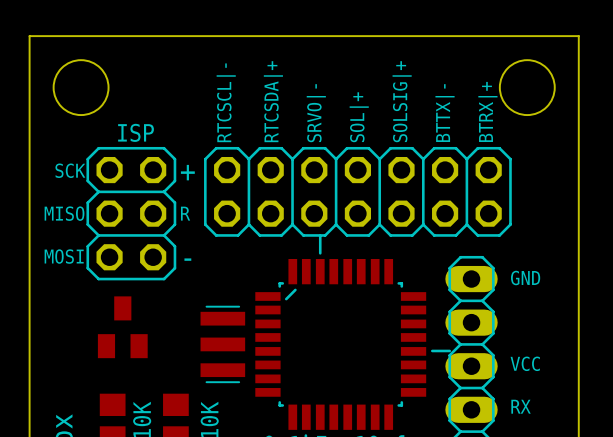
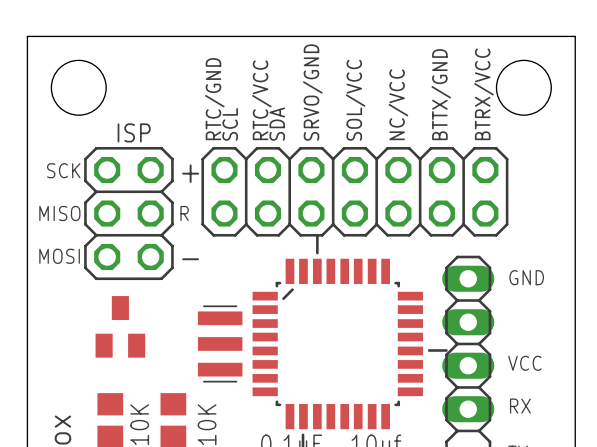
text: RTCSDA|+ (273, 101) -> none
text: SOLSIG|+ (402, 101) -> NC/VCC (398, 104)
text: RTCSCL|- (226, 102) -> none
text: none -> RTC/GND (214, 99)
text: none -> RTC/VCC (261, 100)
text: BTRX|+ (487, 111) -> BTRX/VCC (484, 94)
text: SRVO|- (316, 113) -> SRVO/GND (312, 92)
text: BTTX|- (445, 113) -> BTTX/GND (441, 94)
text: SOL|+ (359, 117) -> SOL/VCC (355, 100)
text: none -> SCL (230, 124)
text: none -> SDA (277, 124)

